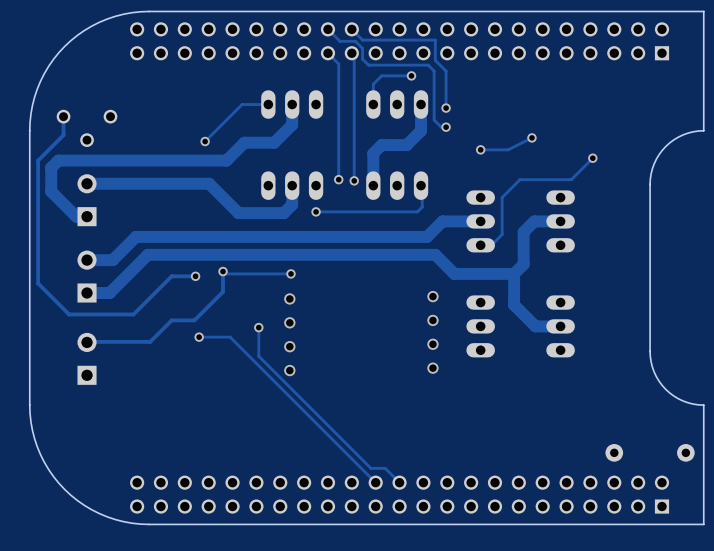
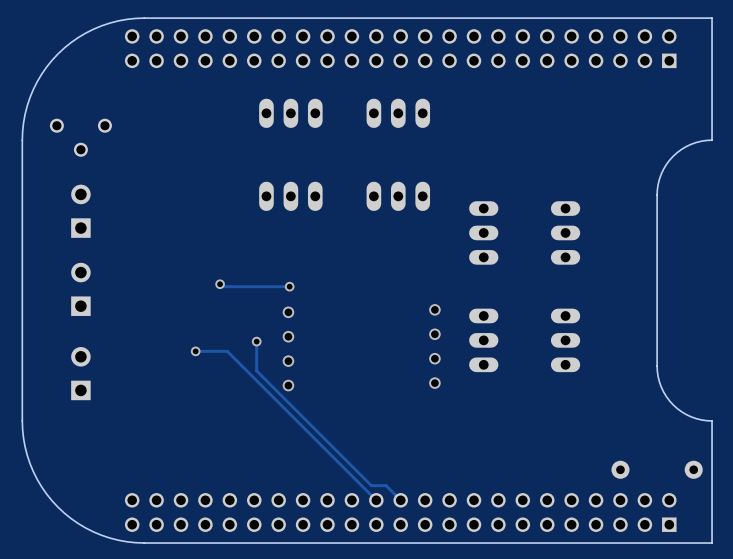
track: (327, 29) (339, 41) (355, 41) (362, 48) (362, 59) (368, 65) (428, 65) (434, 71) (434, 120) (441, 127) (446, 127) -> none
track: (351, 29) (362, 40) (435, 40) (435, 60) (446, 71) (446, 108) -> none
track: (327, 53) (338, 63) (338, 179) -> none
track: (351, 53) (354, 55) (354, 180) -> none
track: (411, 75) (381, 75) (373, 84) (373, 104) -> none
via: (411, 75) -> none
track: (268, 104) (242, 104) (205, 141) -> none
track: (292, 104) (292, 124) (274, 142) (244, 142) (226, 160) (58, 160) (51, 167) (51, 191) (76, 216) (87, 216) -> none
track: (421, 104) (421, 130) (406, 145) (381, 145) (373, 153) (373, 185) -> none
via: (446, 108) -> none
track: (63, 116) (63, 135) (38, 160) (38, 283) (69, 314) (133, 314) (171, 276) (195, 276) -> none
via: (446, 127) -> none
track: (531, 137) (508, 149) (480, 149) -> none
via: (531, 137) -> none
via: (205, 141) -> none
via: (480, 149) -> none
track: (592, 158) (571, 179) (520, 179) (502, 197) (502, 234) (491, 245) (480, 245) -> none
via: (592, 158) -> none
via: (338, 179) -> none
via: (354, 180) -> none
track: (87, 183) (209, 183) (238, 213) (283, 213) (292, 204) (292, 185) -> none
track: (421, 185) (422, 207) (417, 211) (316, 211) -> none
via: (316, 211) -> none
track: (480, 221) (442, 221) (427, 236) (135, 236) (112, 260) (87, 260) -> none
track: (560, 221) (534, 221) (523, 232) (523, 264) (514, 273) (454, 273) (435, 254) (147, 254) (109, 293) (87, 293) -> none
track: (223, 271) (223, 291) (194, 320) (171, 320) (150, 341) (87, 342) -> none
track: (511, 273) (514, 276) (514, 304) (535, 326) (560, 326) -> none
via: (195, 276) -> none

